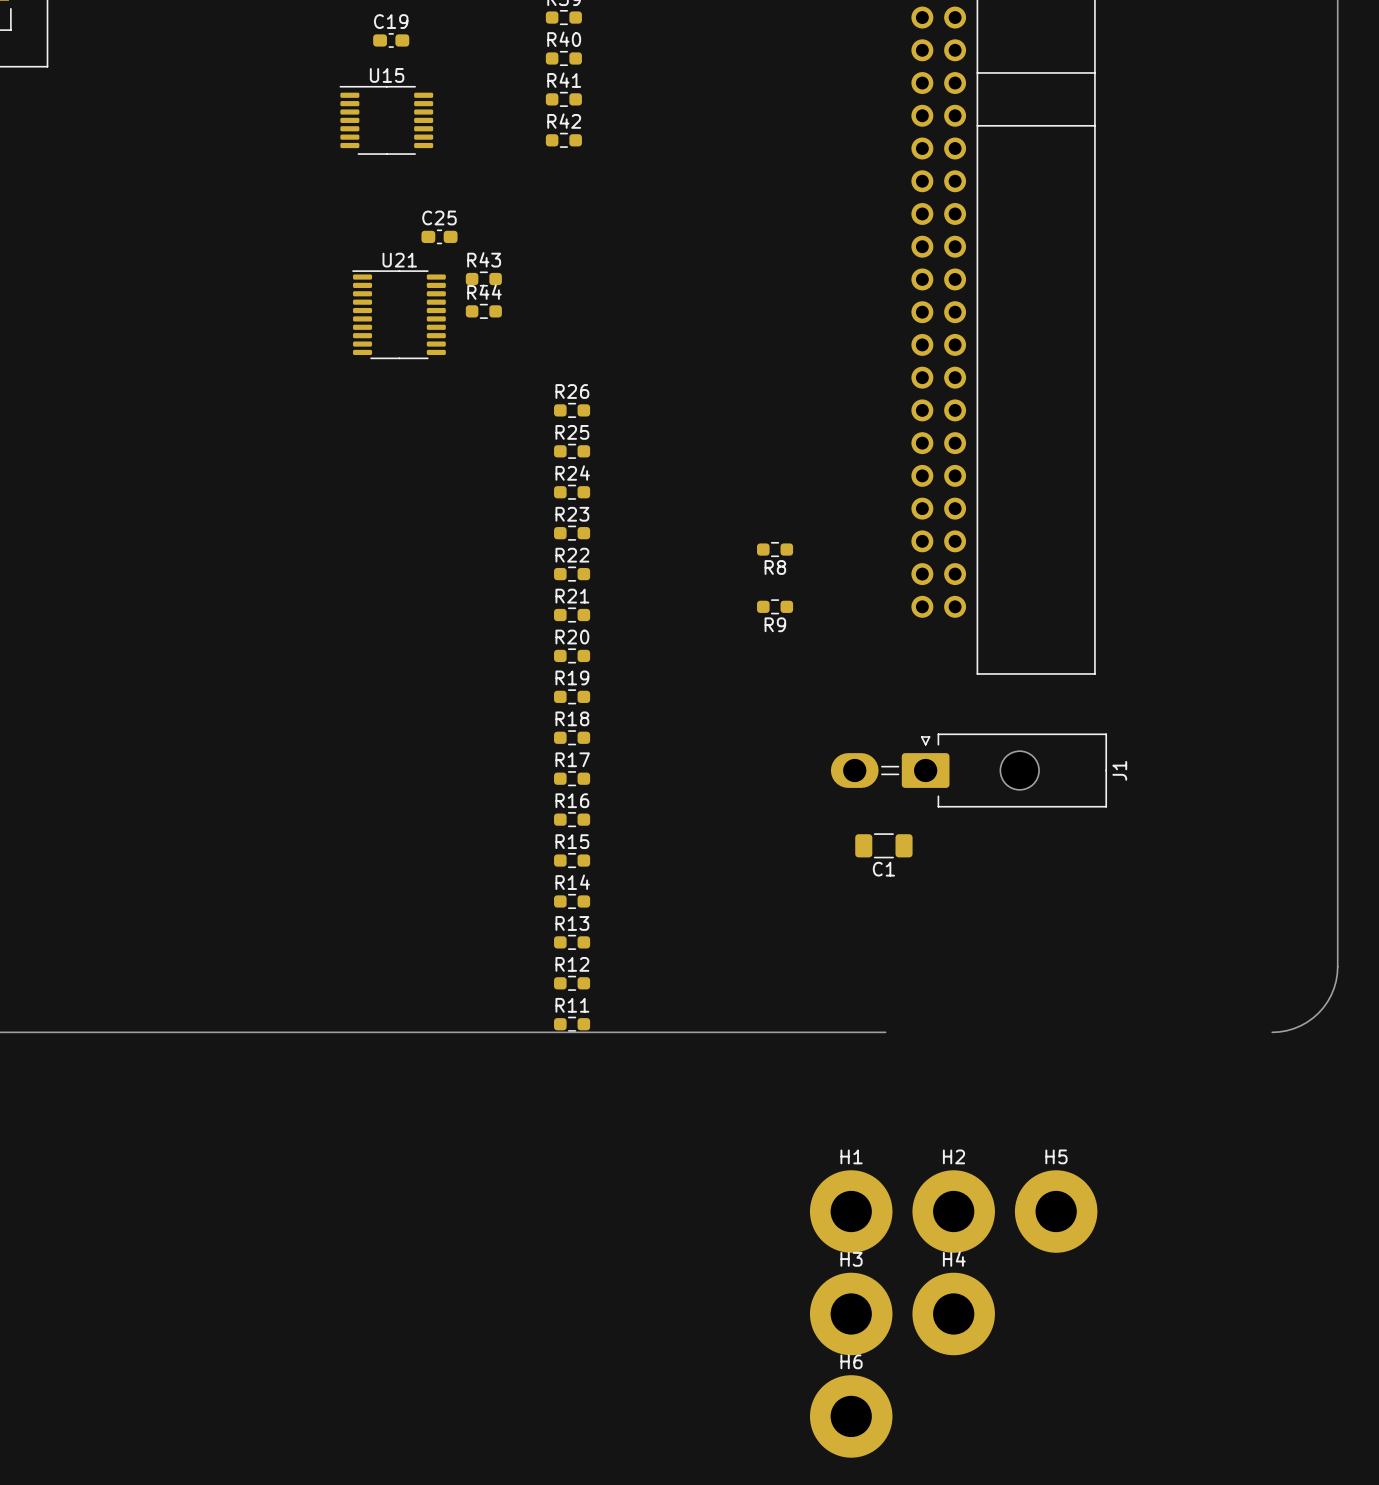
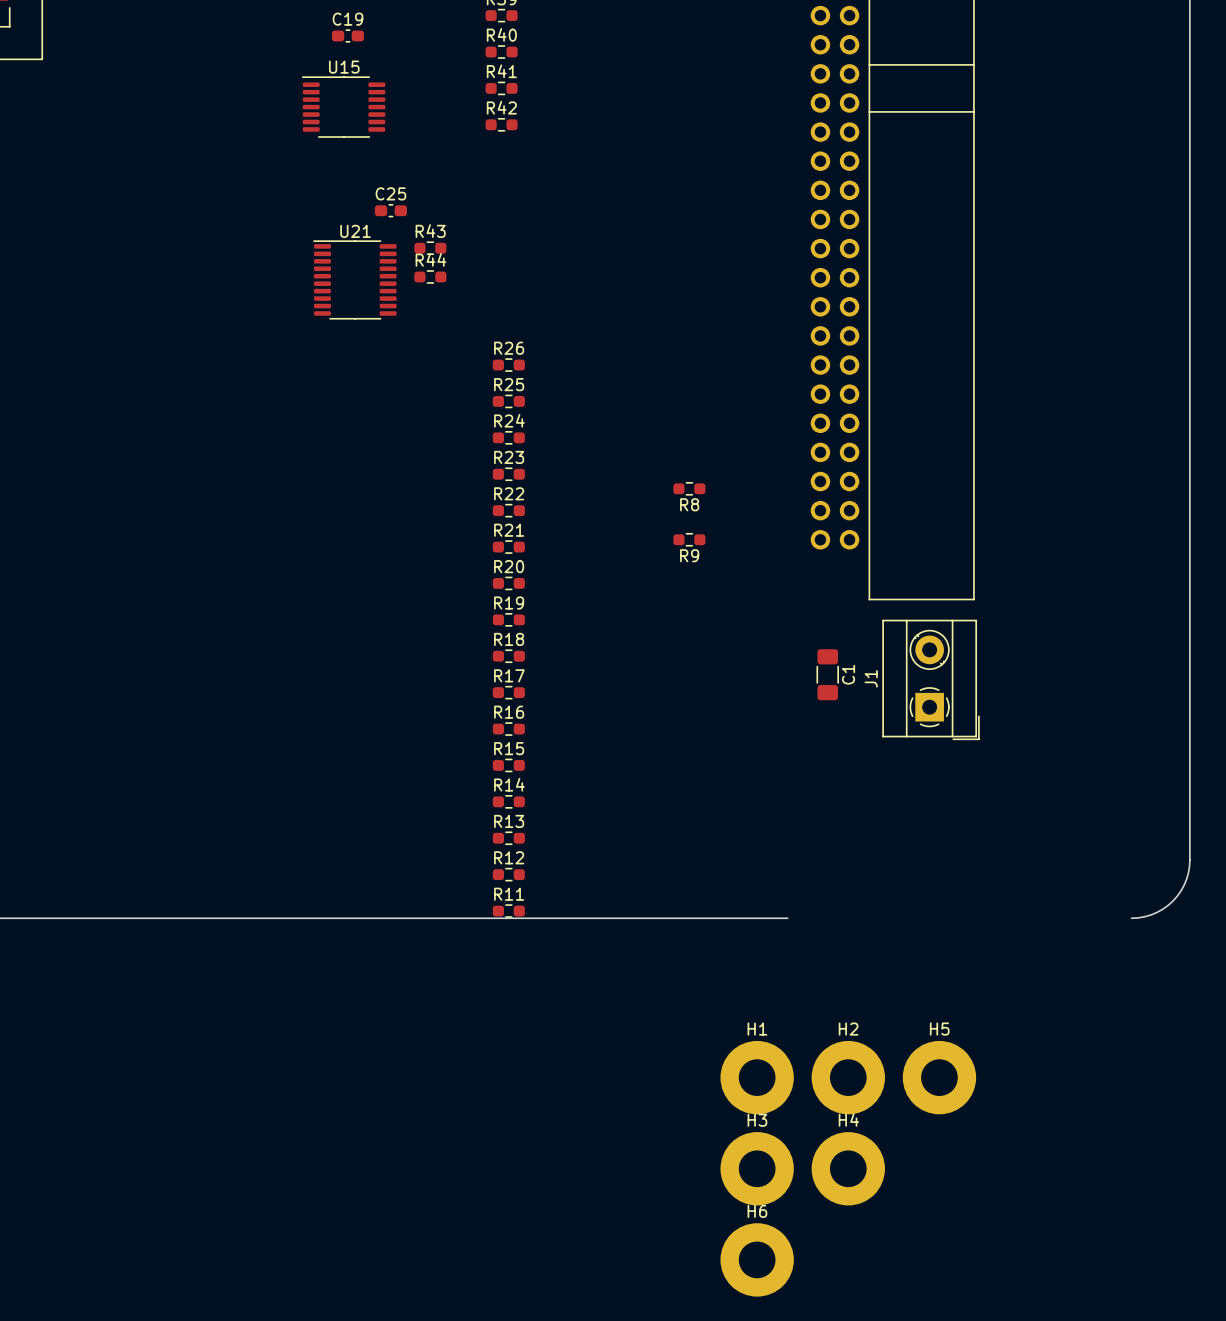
J1 footprint: [830, 733, 1107, 808] -> [882, 619, 980, 740]
J1 name position: J1 (1119, 770) -> J1 (871, 678)
C1 rotation: 0° (883, 845) -> 90° clockwise (827, 674)
C1 position: (883, 845) -> (827, 674)
C1 name position: C1 (883, 869) -> C1 (848, 674)

